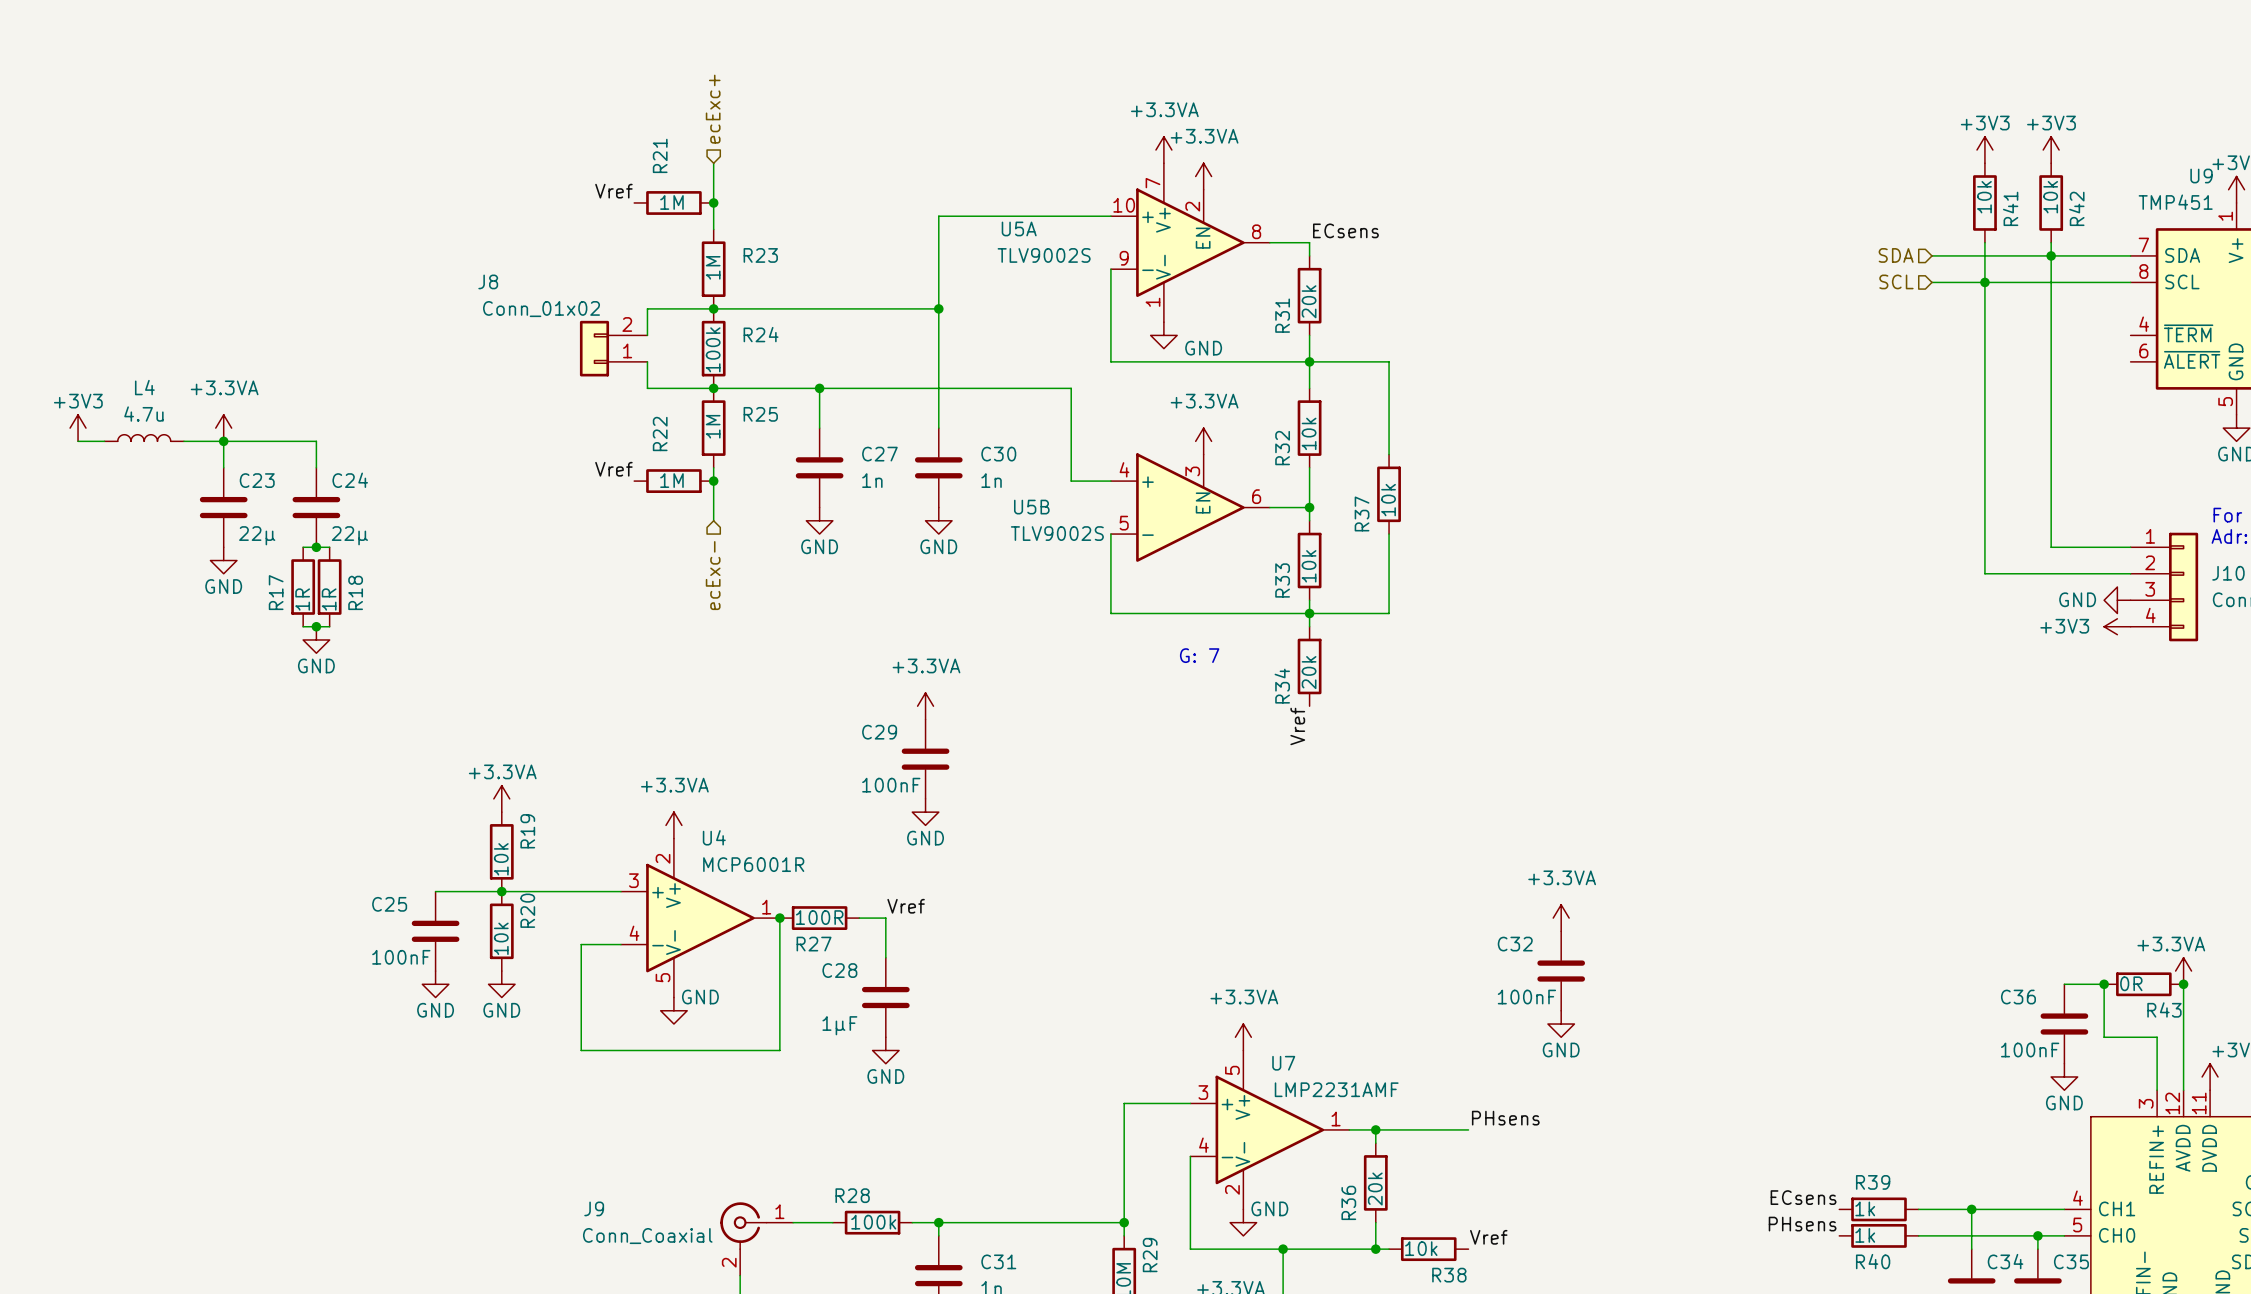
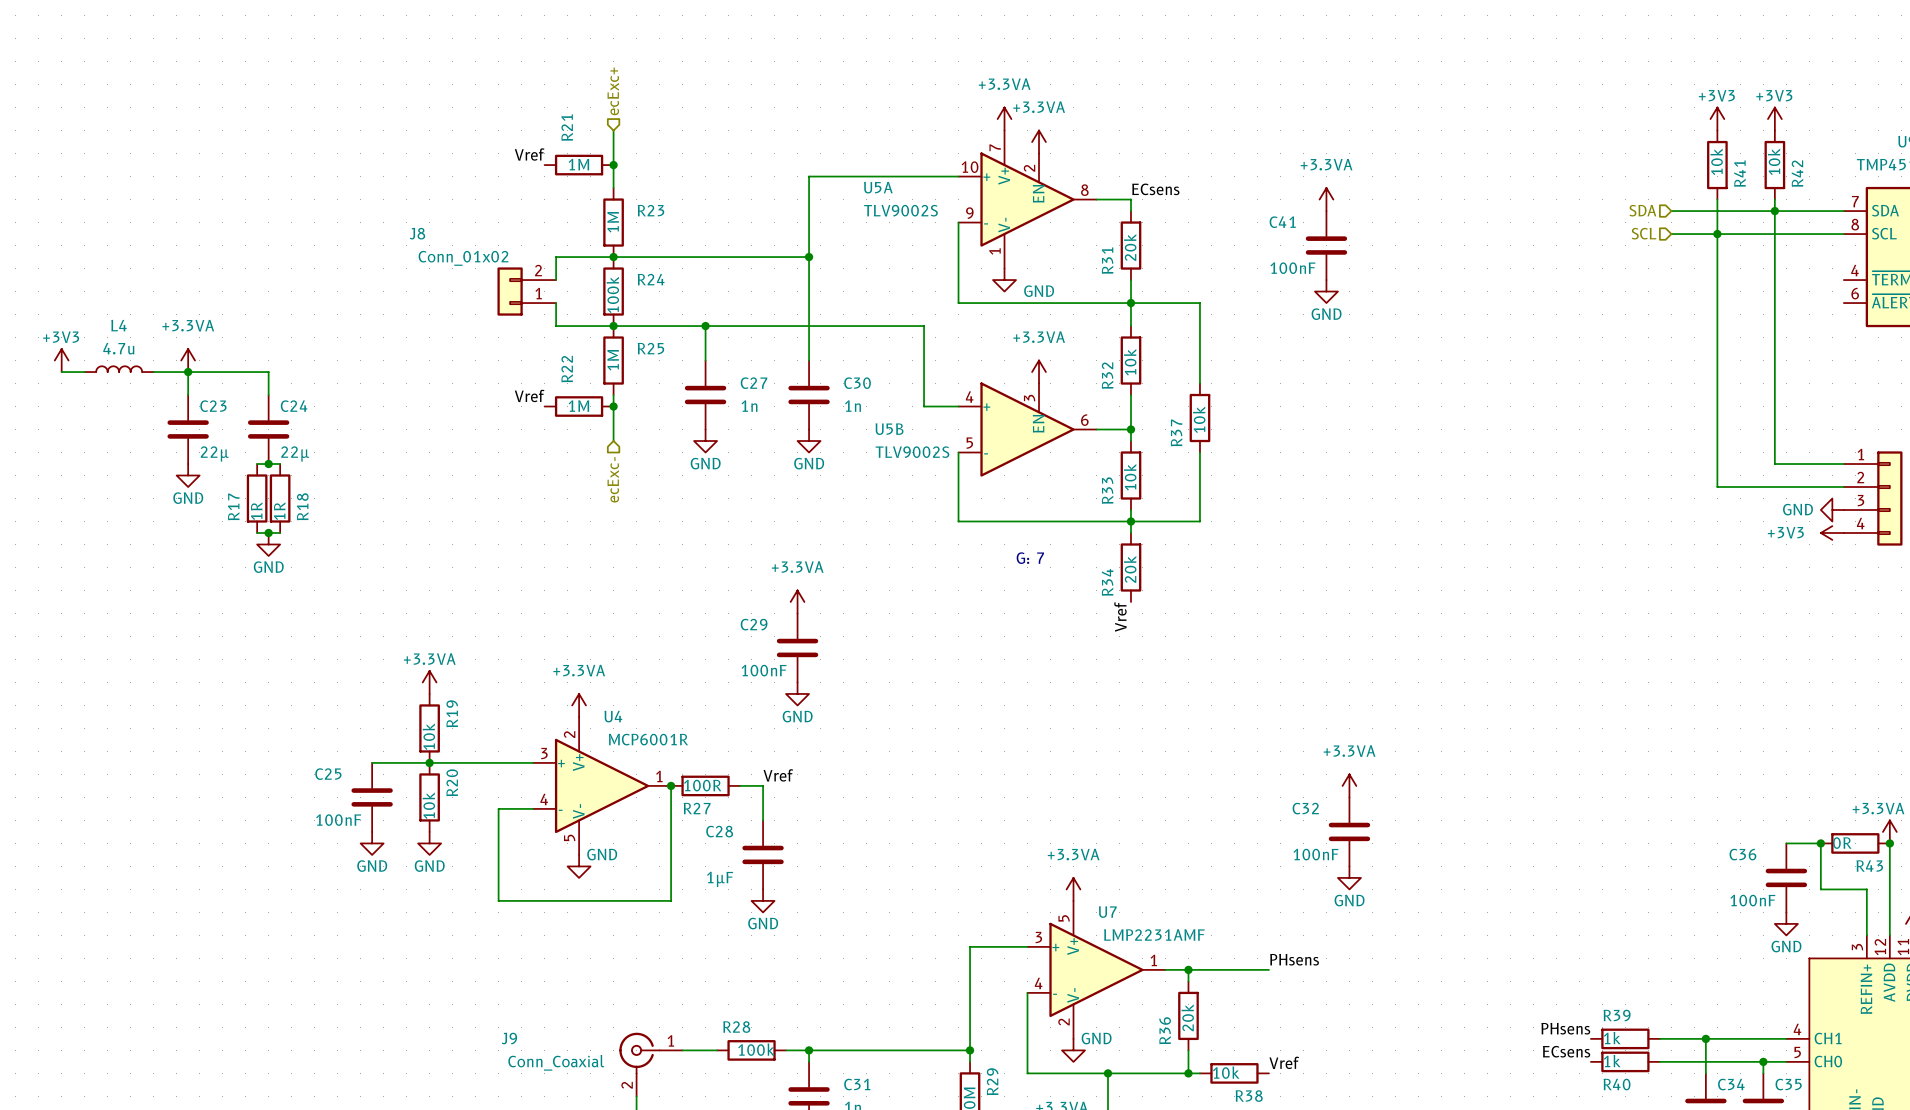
power symbol: none -> +3.3VA (1326, 199)
C41: none -> 100nF (1326, 245)
power symbol: none -> GND (1326, 291)
label: ECsens (1803, 1197) -> PHsens (1565, 1028)
label: PHsens (1802, 1224) -> ECsens (1566, 1051)

